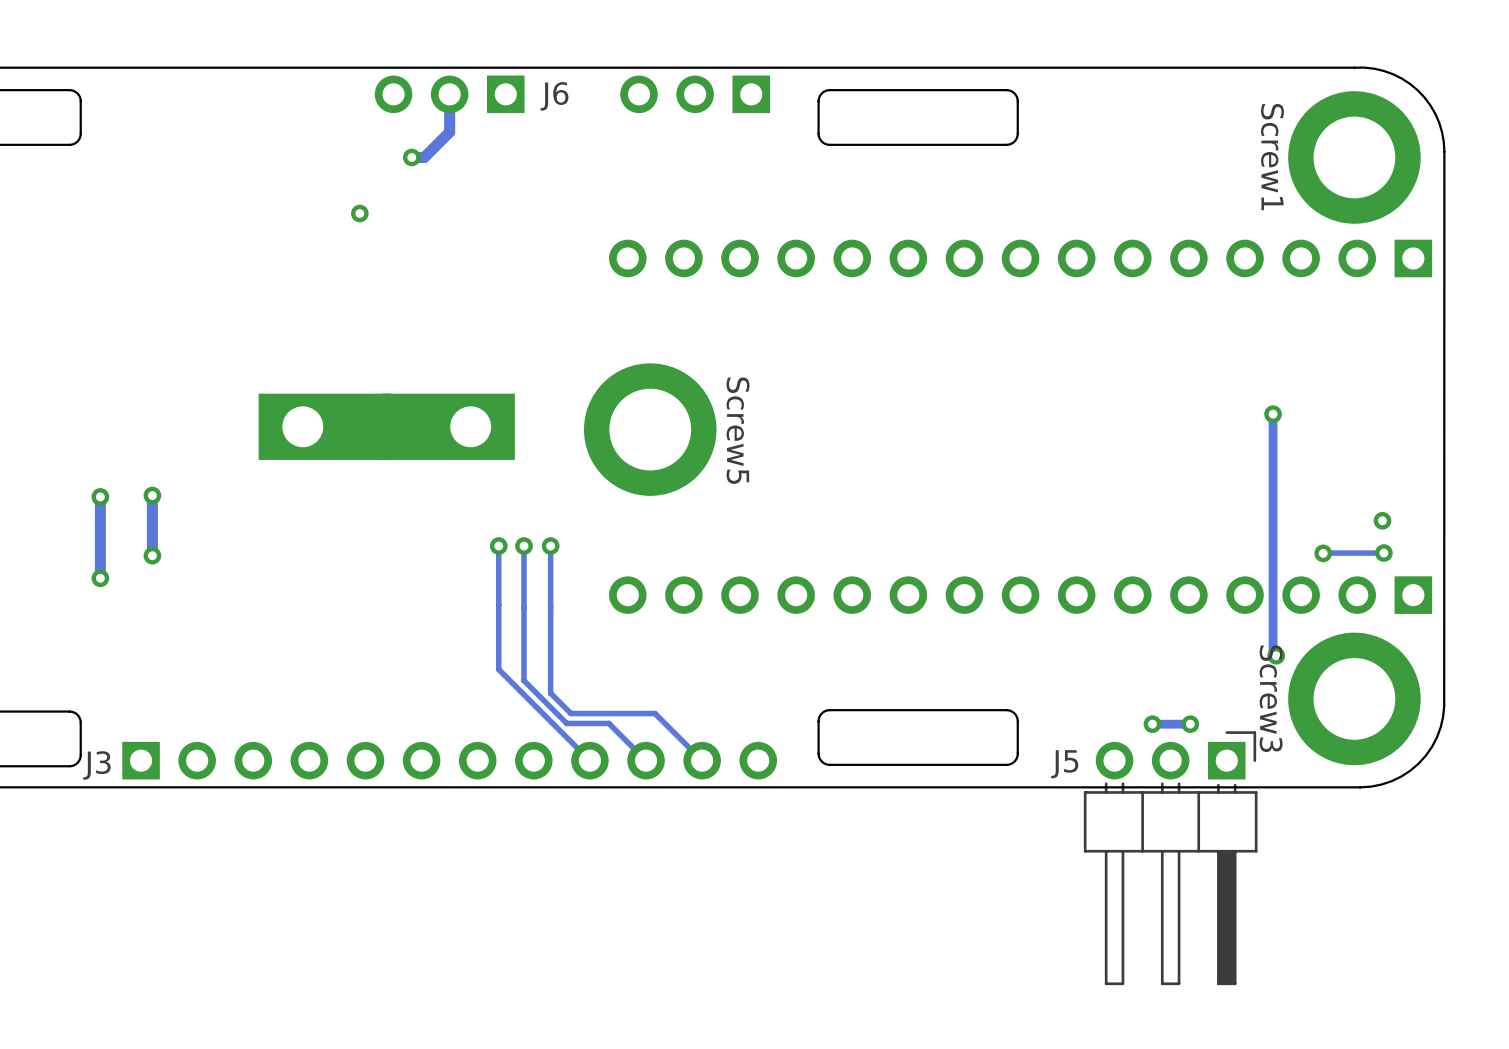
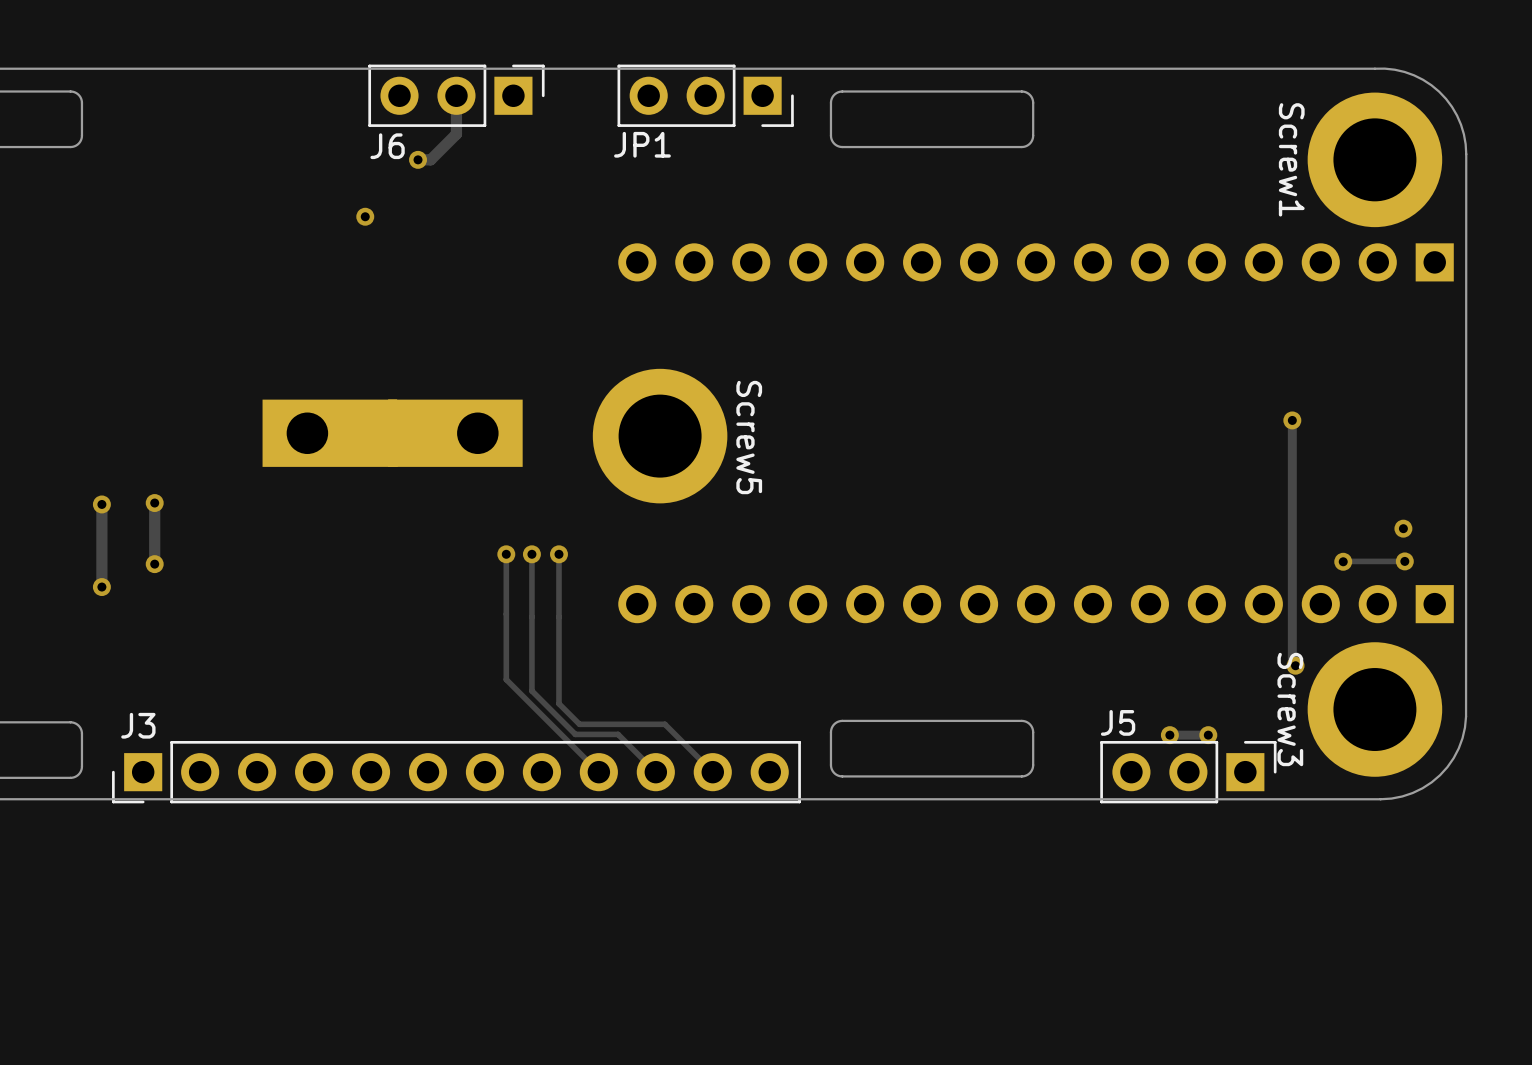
J6 side: top (449, 94) -> bottom (456, 95)
JP1 side: top (695, 94) -> bottom (705, 95)
J5 footprint: [1083, 731, 1258, 986] -> [1100, 740, 1277, 804]
J3 side: top (449, 760) -> bottom (456, 772)
J5 name position: J5 (1064, 764) -> J5 (1118, 722)

